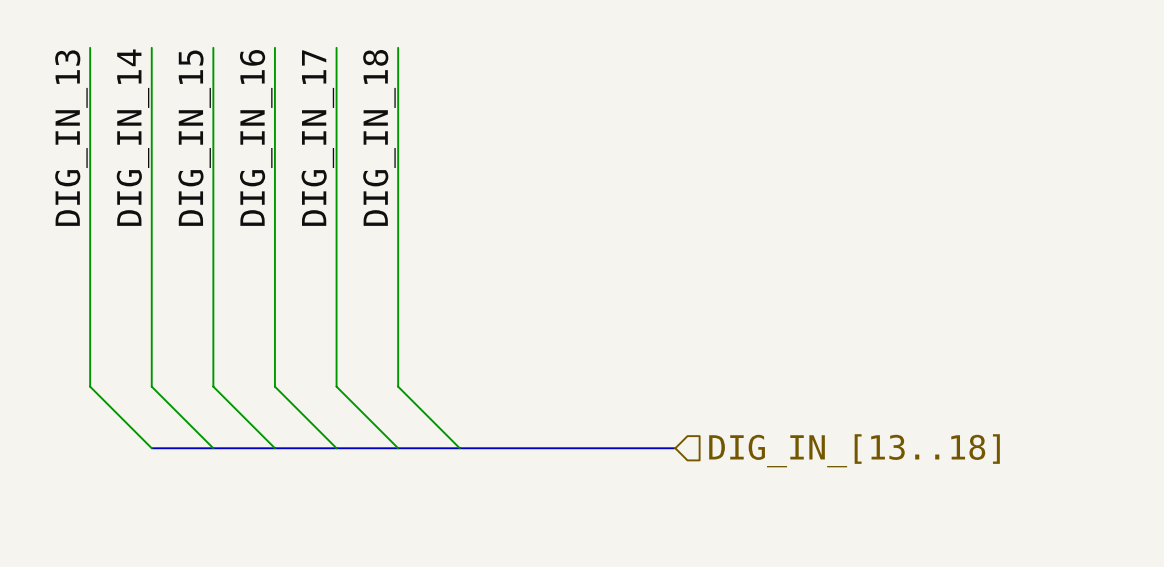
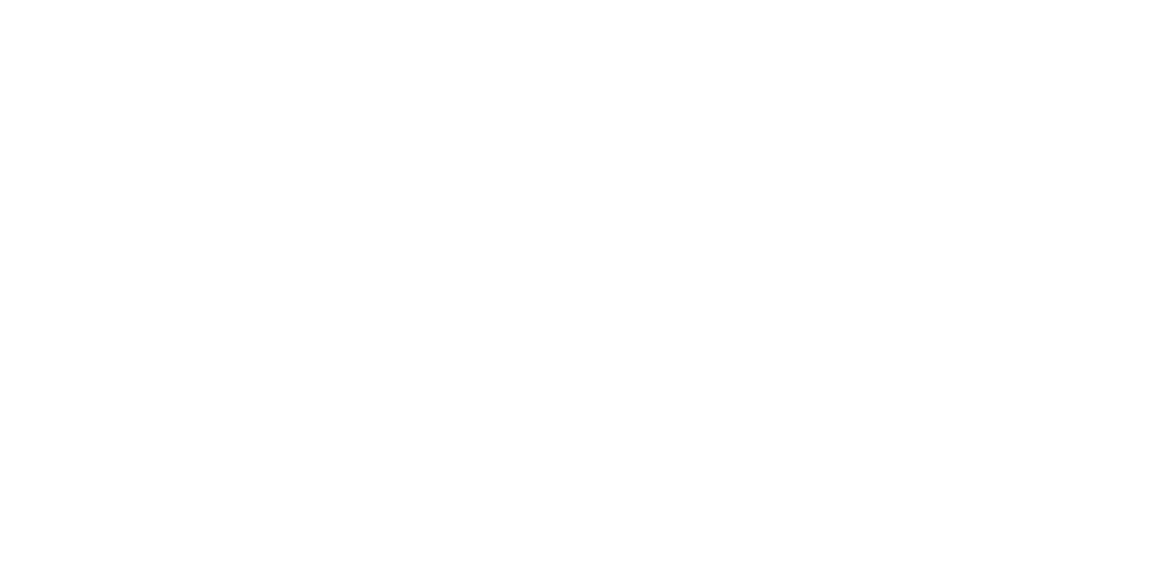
wire: (90, 47) (90, 386) (151, 448) -> none
wire: (151, 47) (151, 386) (213, 448) -> none
wire: (213, 47) (213, 386) (274, 448) -> none
wire: (274, 47) (274, 386) (336, 448) -> none
wire: (336, 47) (336, 386) (398, 448) -> none
wire: (398, 47) (398, 386) (459, 448) -> none
label: DIG_IN_14 (133, 137) -> none
label: DIG_IN_16 (256, 137) -> none
label: DIG_IN_18 (379, 137) -> none
label: DIG_IN_13 (71, 138) -> none
label: DIG_IN_15 (194, 138) -> none
label: DIG_IN_17 (317, 138) -> none
bus: (151, 448) (675, 448) -> none
hierarchical label: DIG_IN_[13..18] (854, 450) -> none

